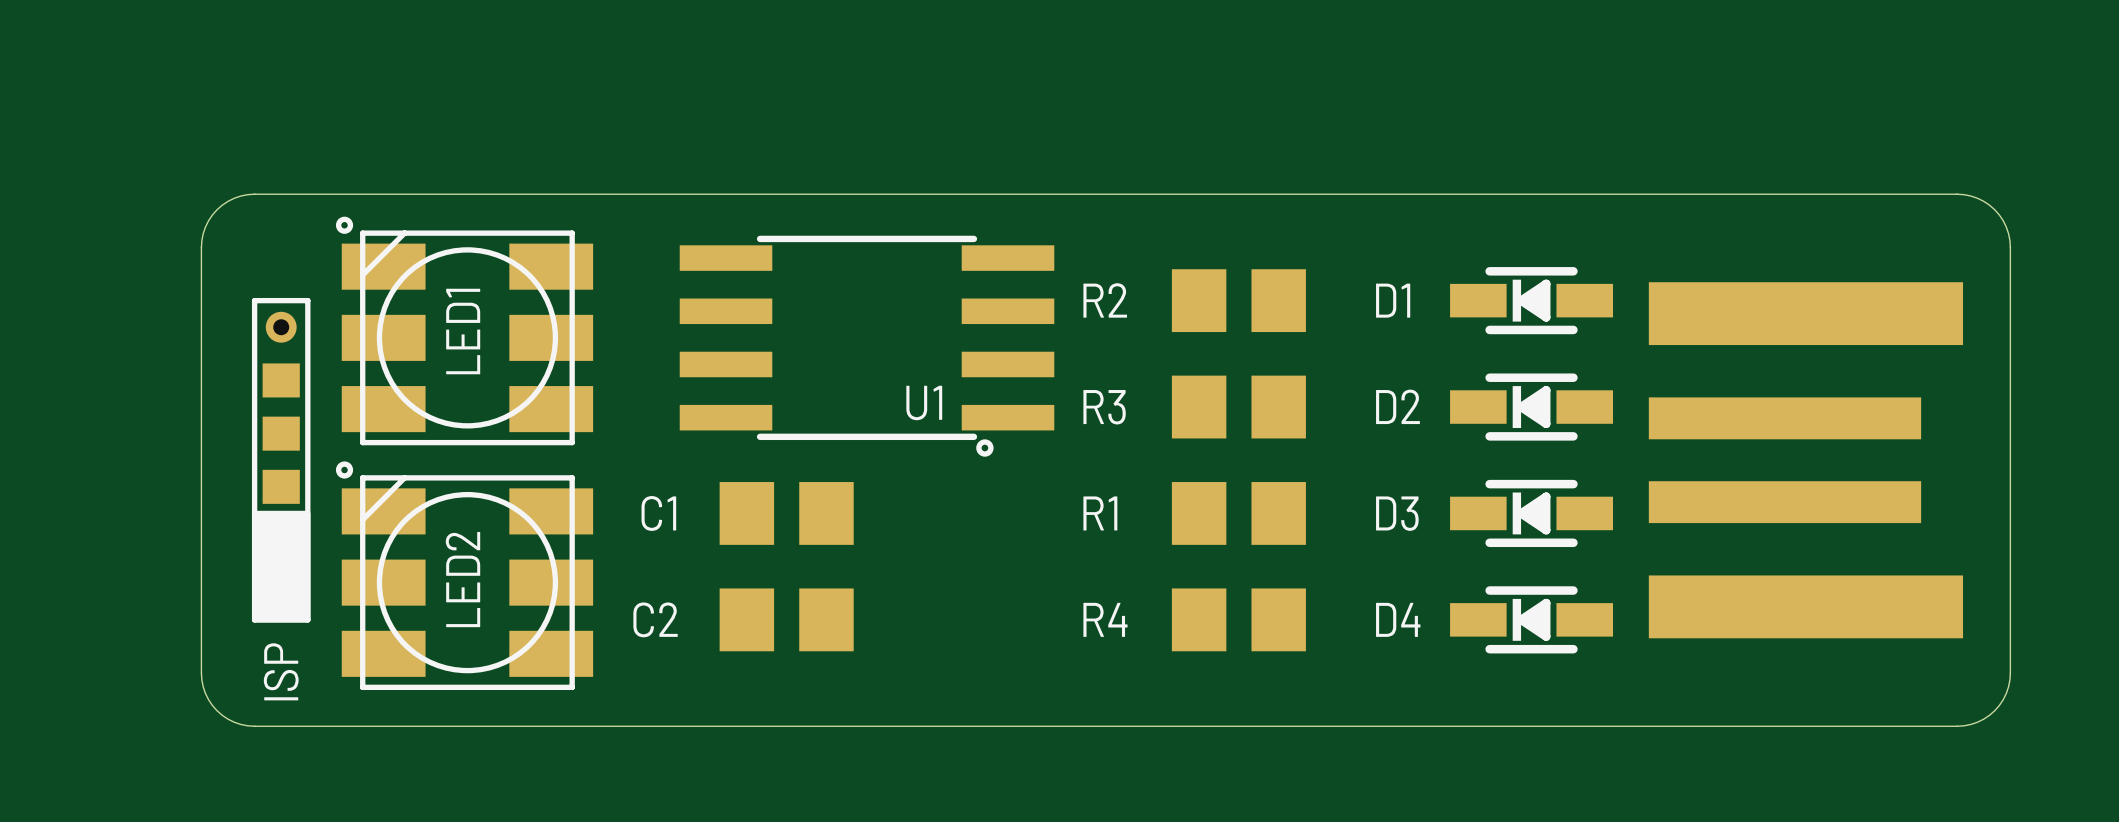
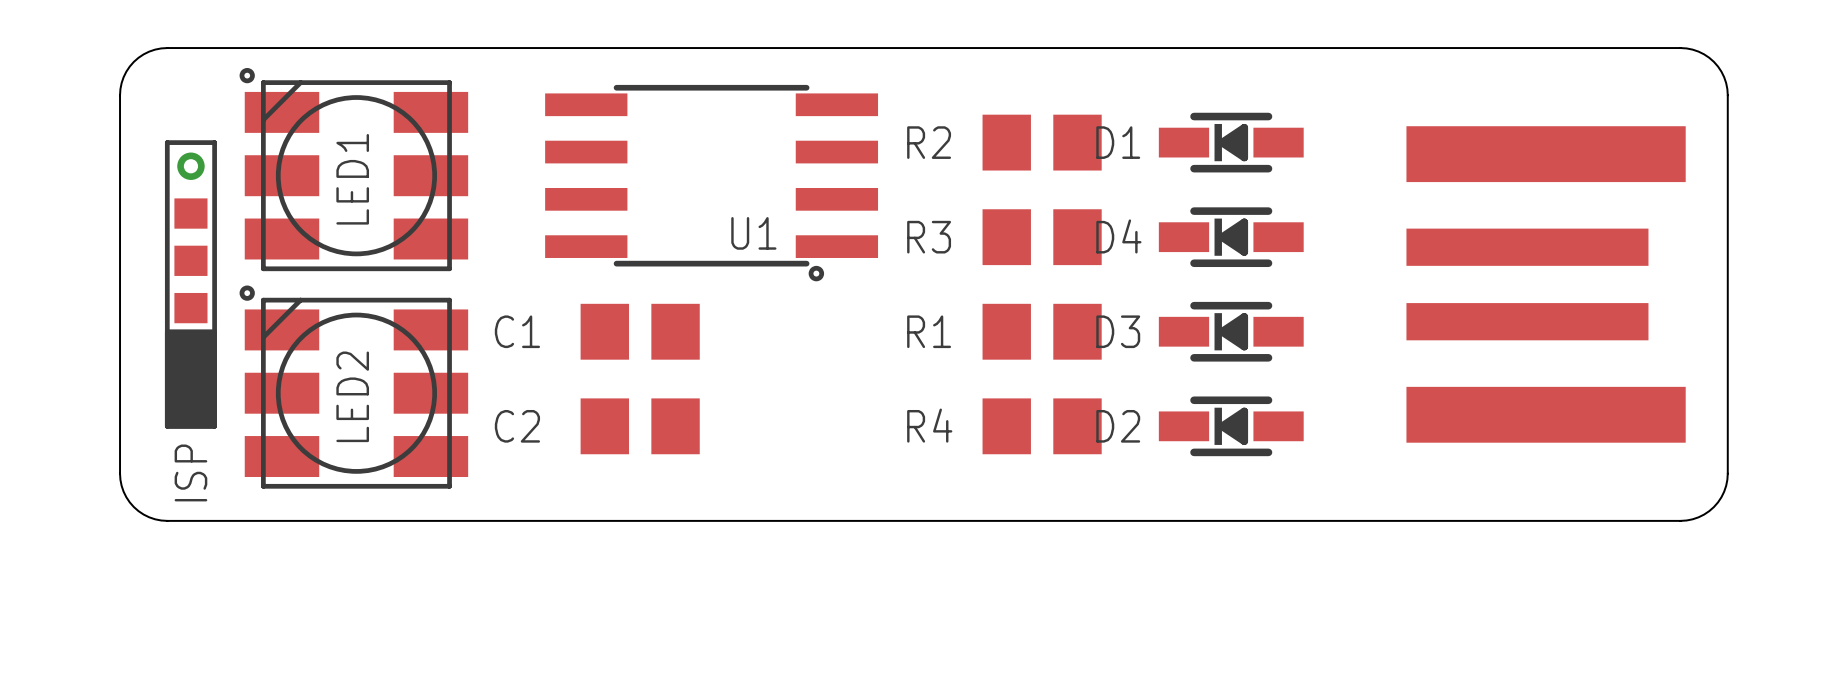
D1 position: (1531, 300) -> (1231, 142)
D2 position: (1531, 407) -> (1231, 426)
D3 position: (1531, 513) -> (1231, 331)
D4 position: (1531, 619) -> (1231, 237)

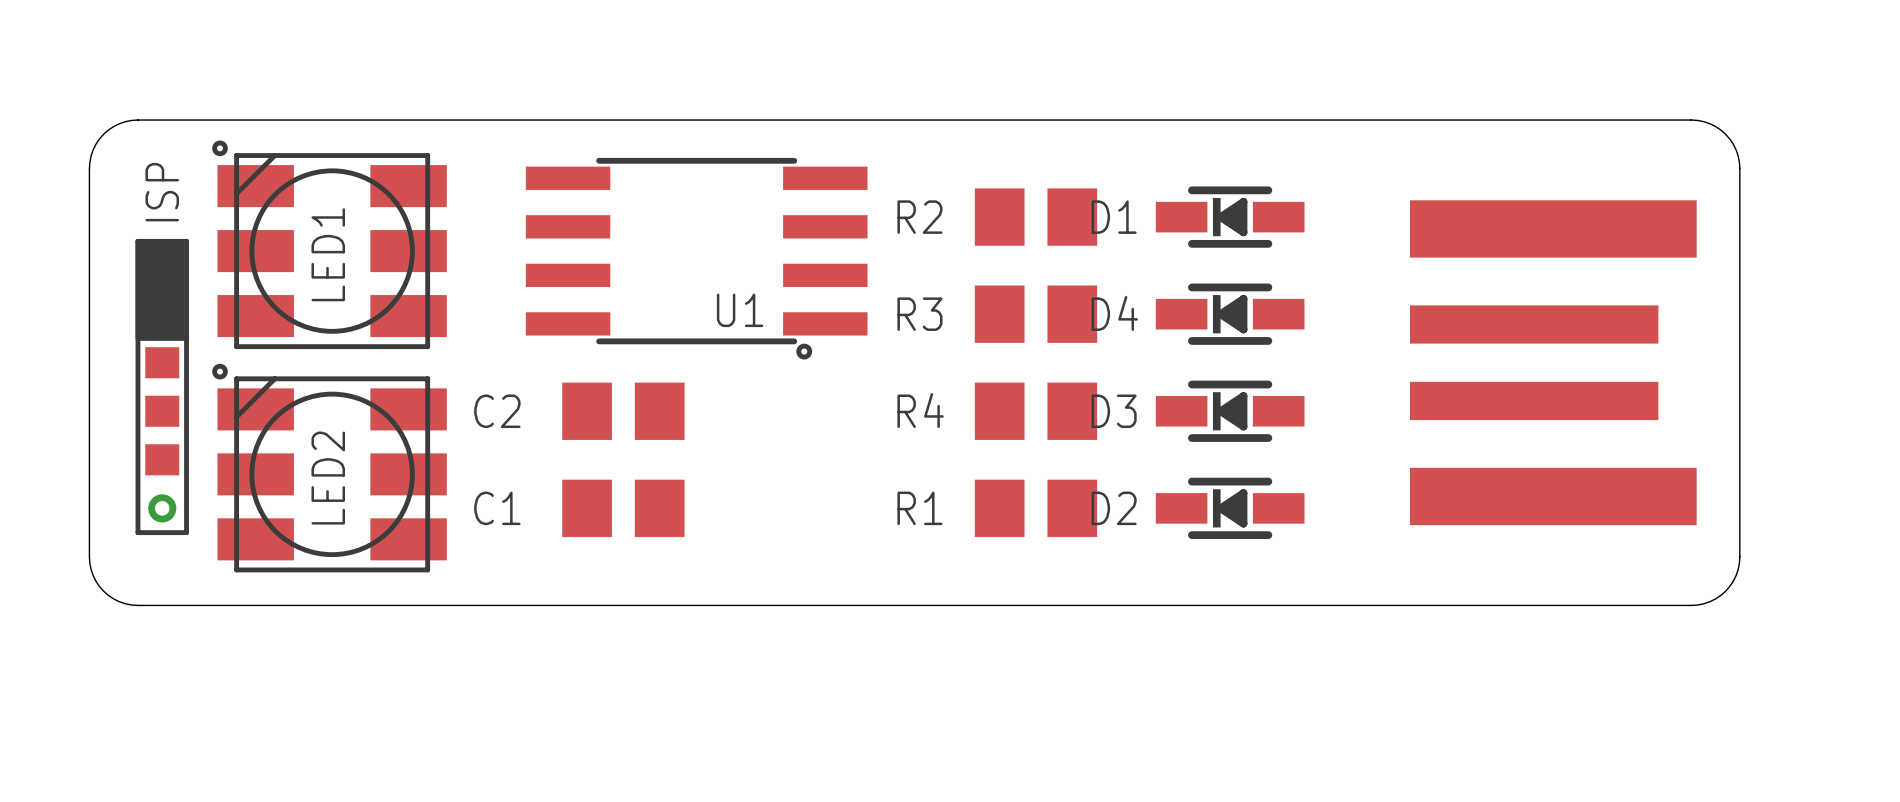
ISP rotation: 0° (190, 284) -> 180° (162, 387)
C1 name: C1 (517, 331) -> C2 (497, 411)
R1 name: R1 (929, 331) -> R4 (920, 410)
R4 name: R4 (929, 425) -> R1 (919, 508)
C2 name: C2 (517, 426) -> C1 (497, 508)

